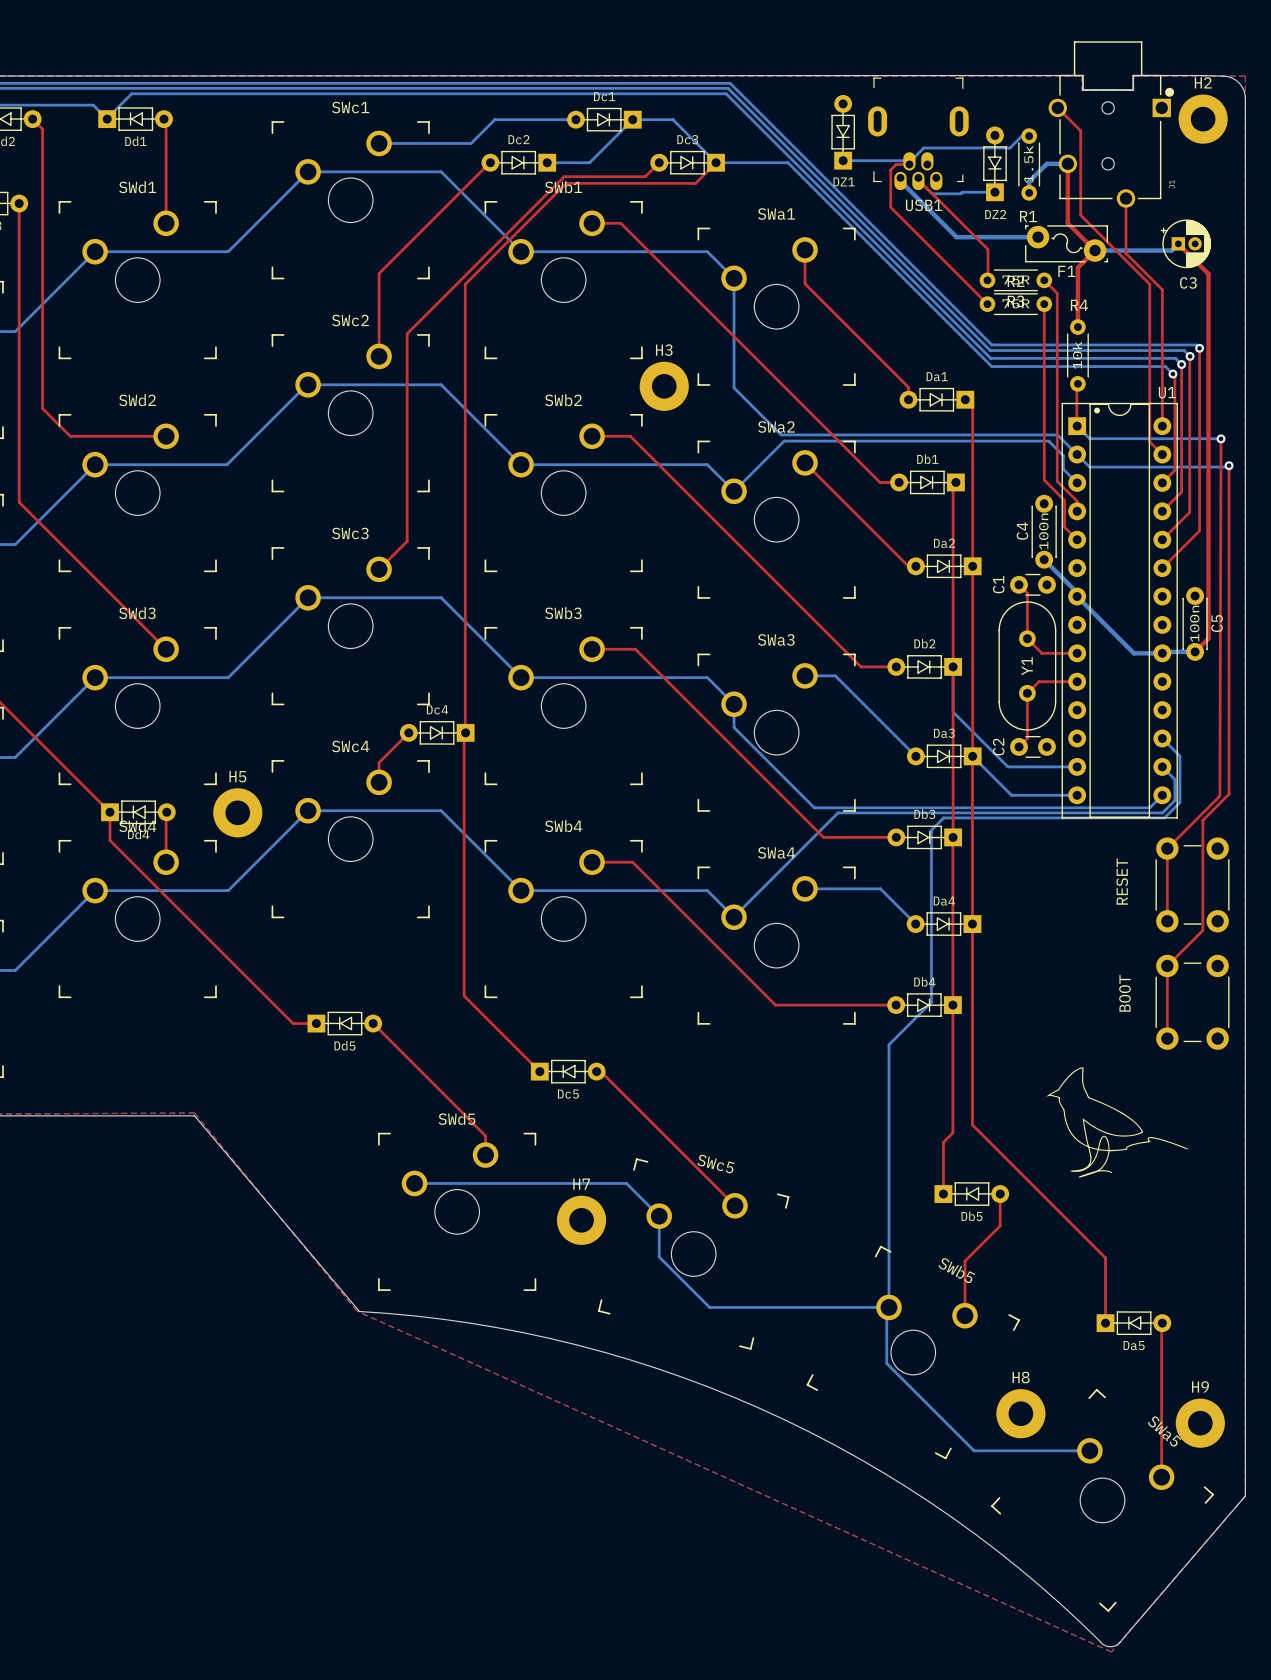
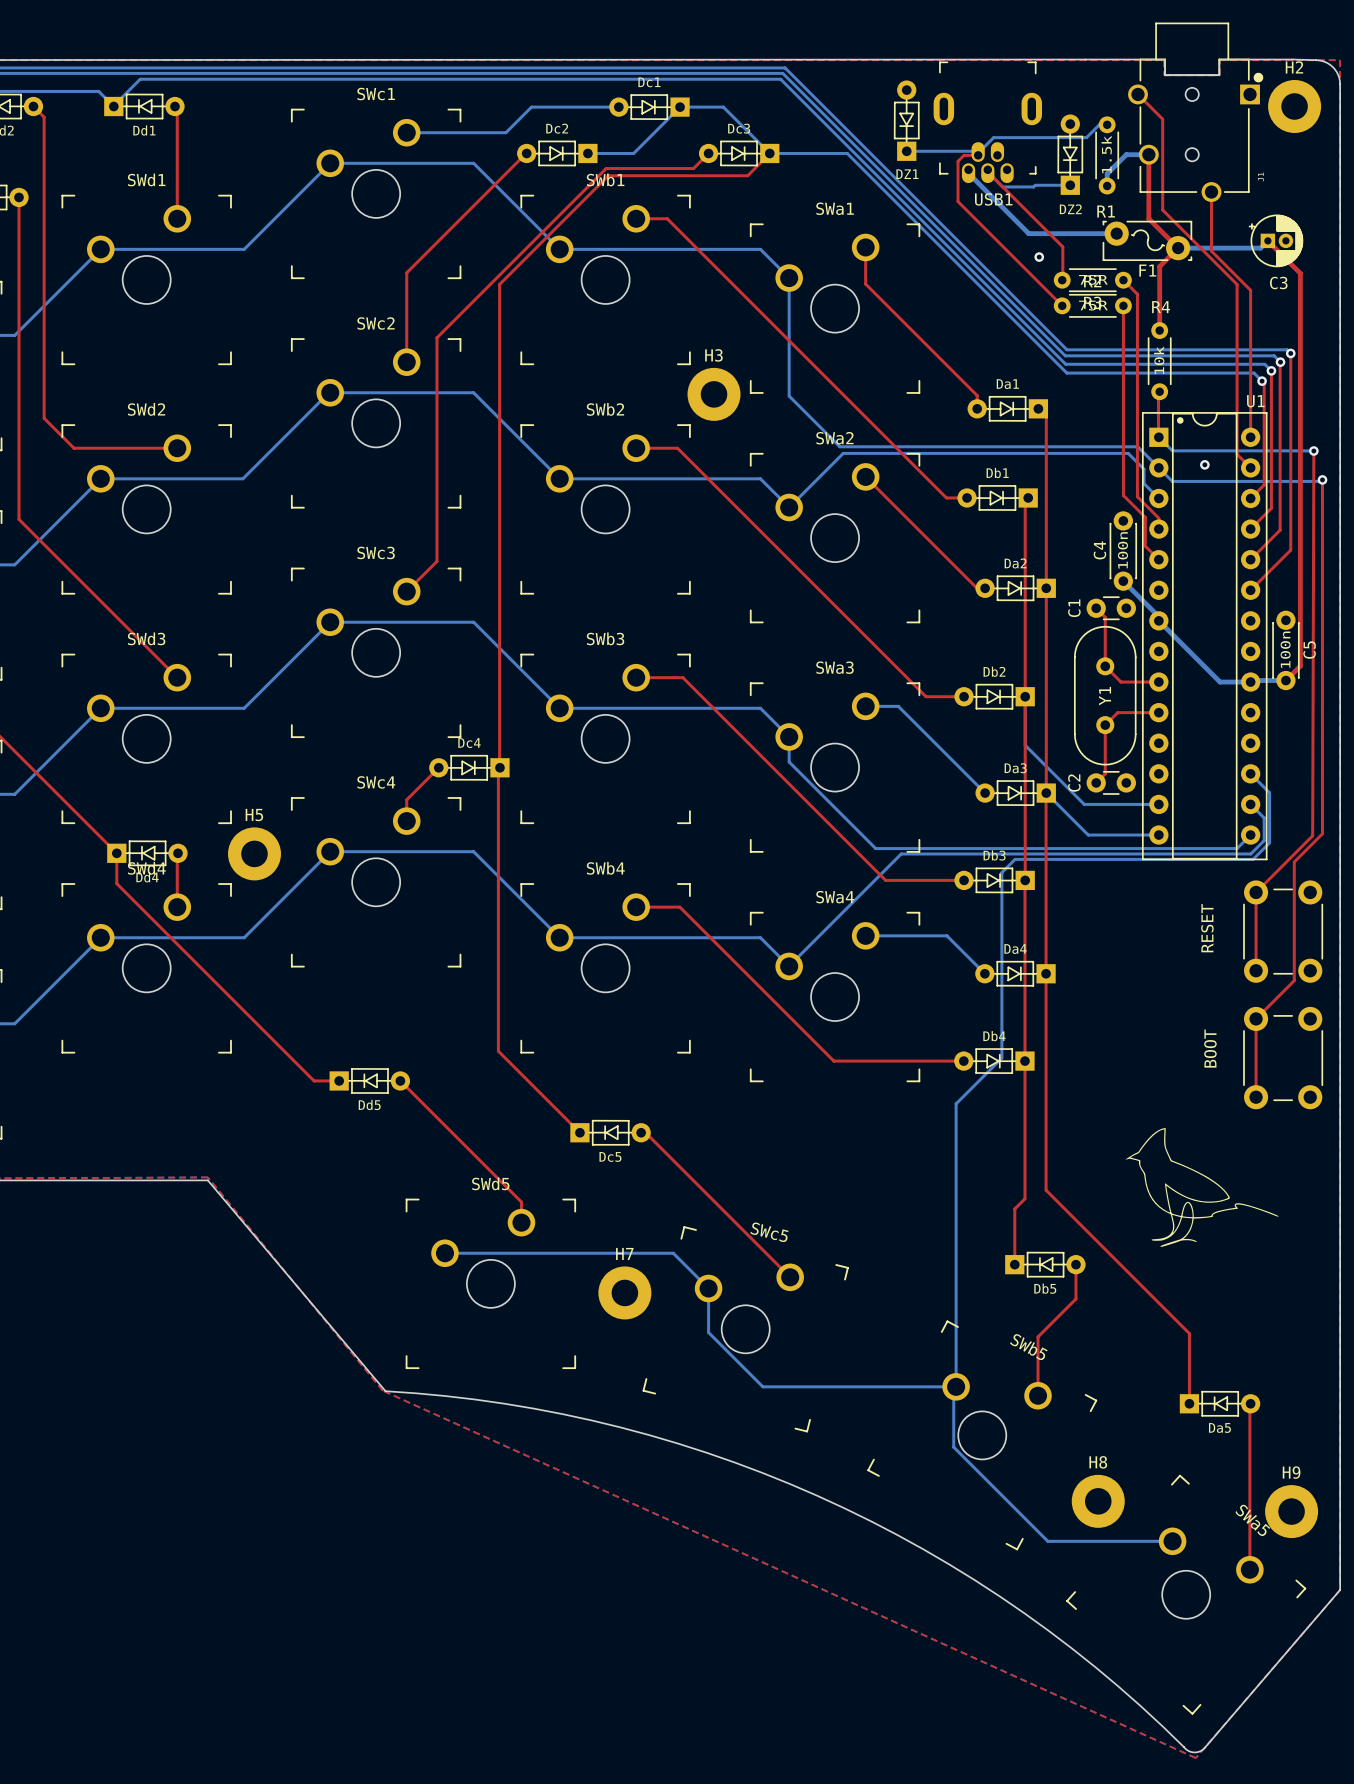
via: none -> (1039, 257)
via: none -> (1204, 464)

